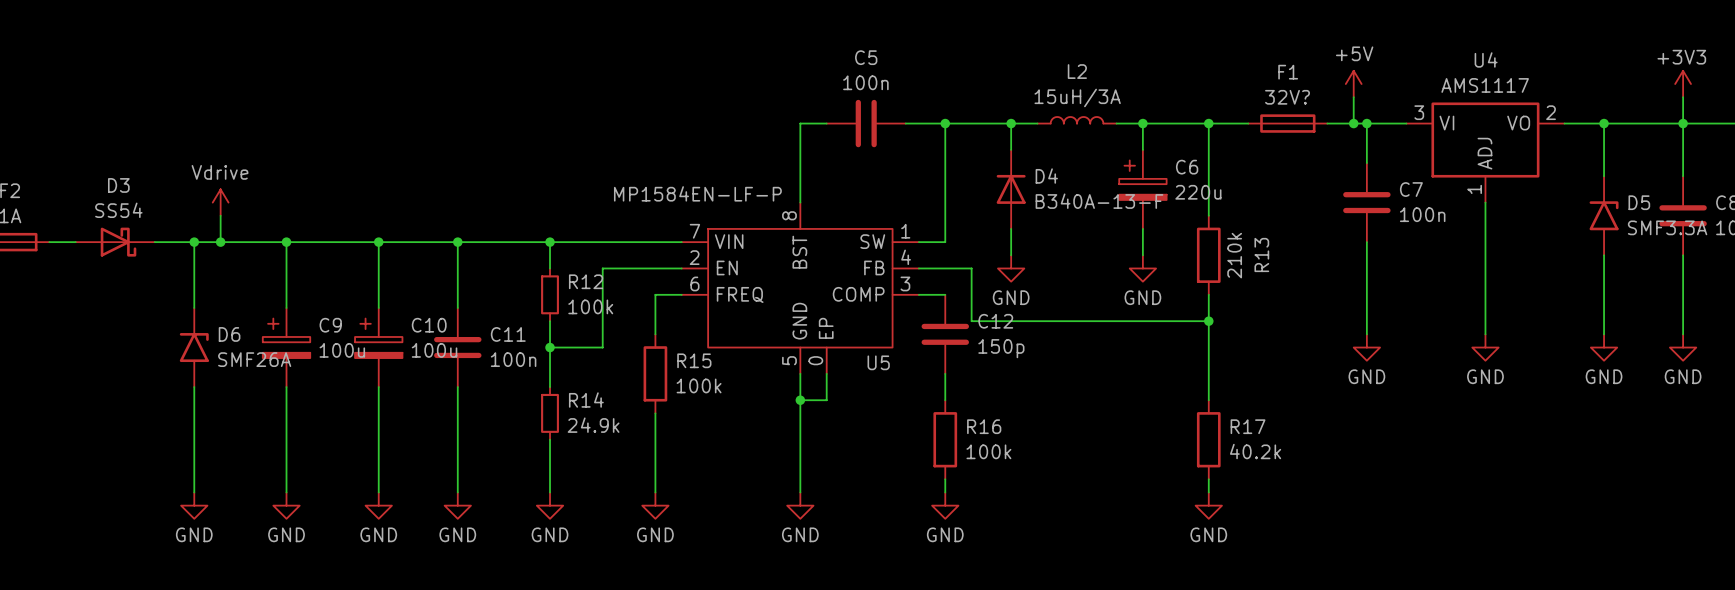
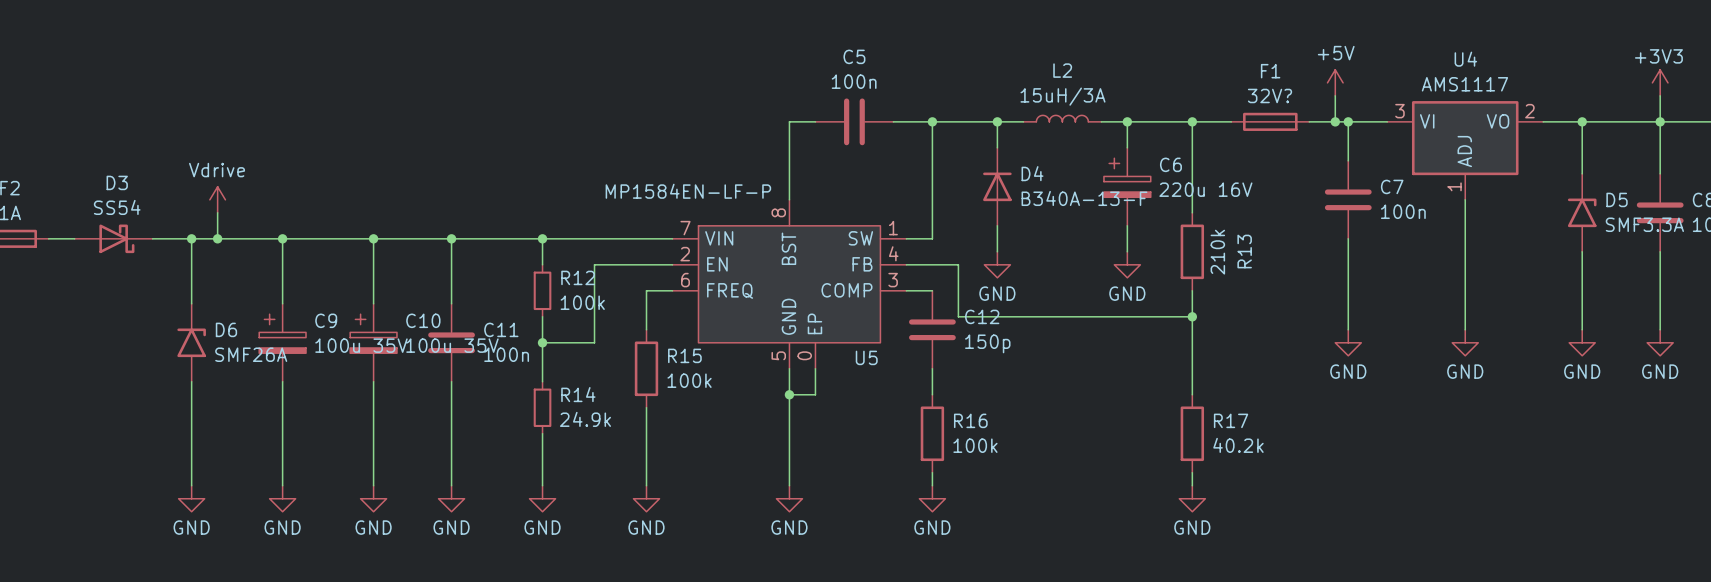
C6 value: 220u (1198, 192) -> 220u 16V (1205, 189)
C9 value: 100u (342, 350) -> 100u 35V (361, 345)
C10 value: 100u (434, 350) -> 100u 35V (452, 345)

